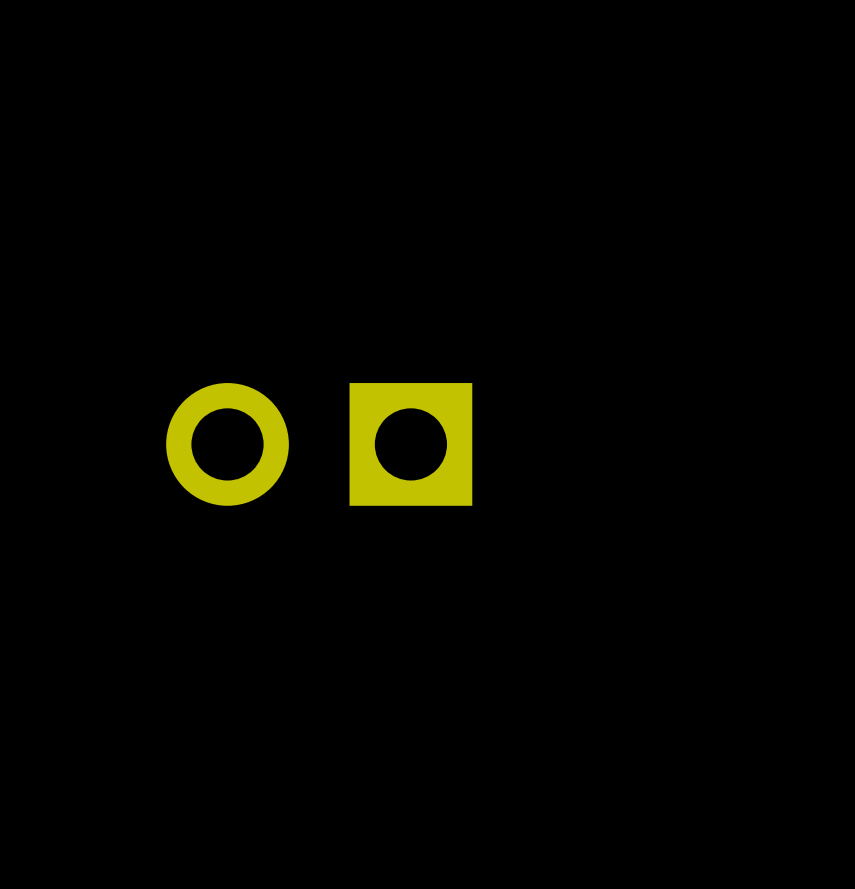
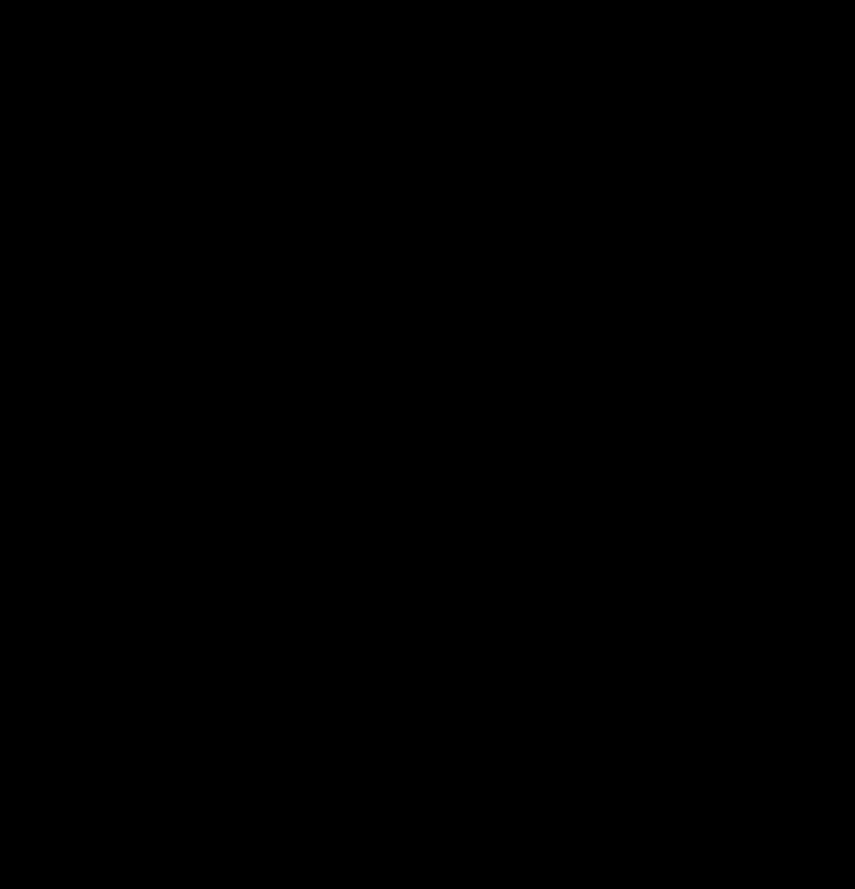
part: (319, 444) -> none

